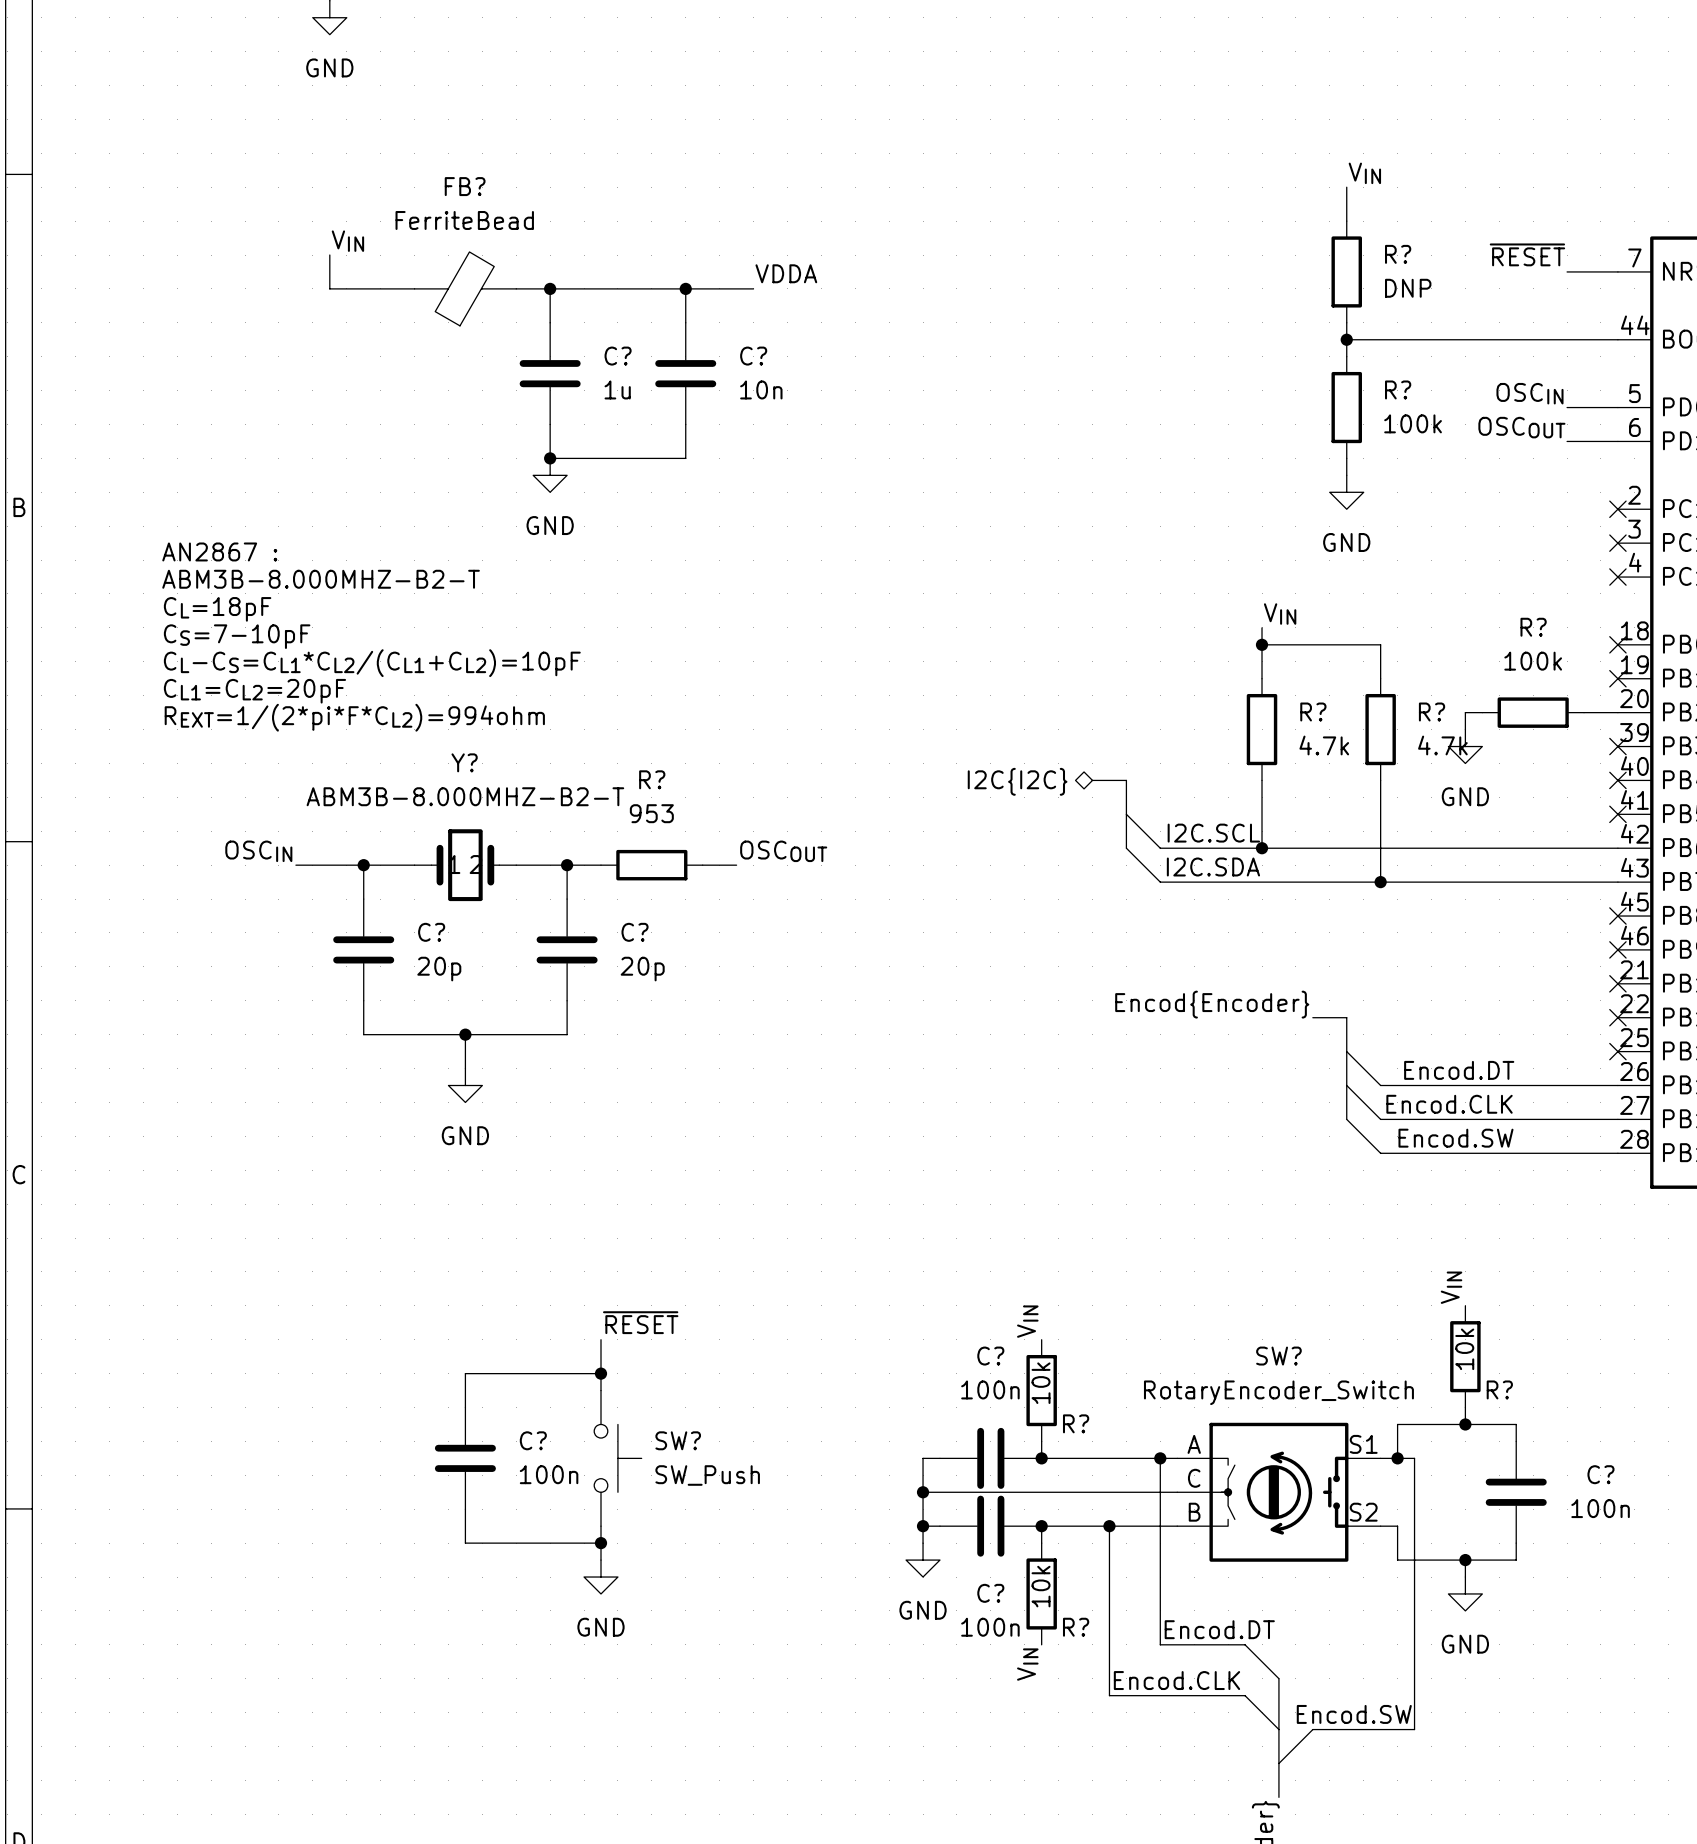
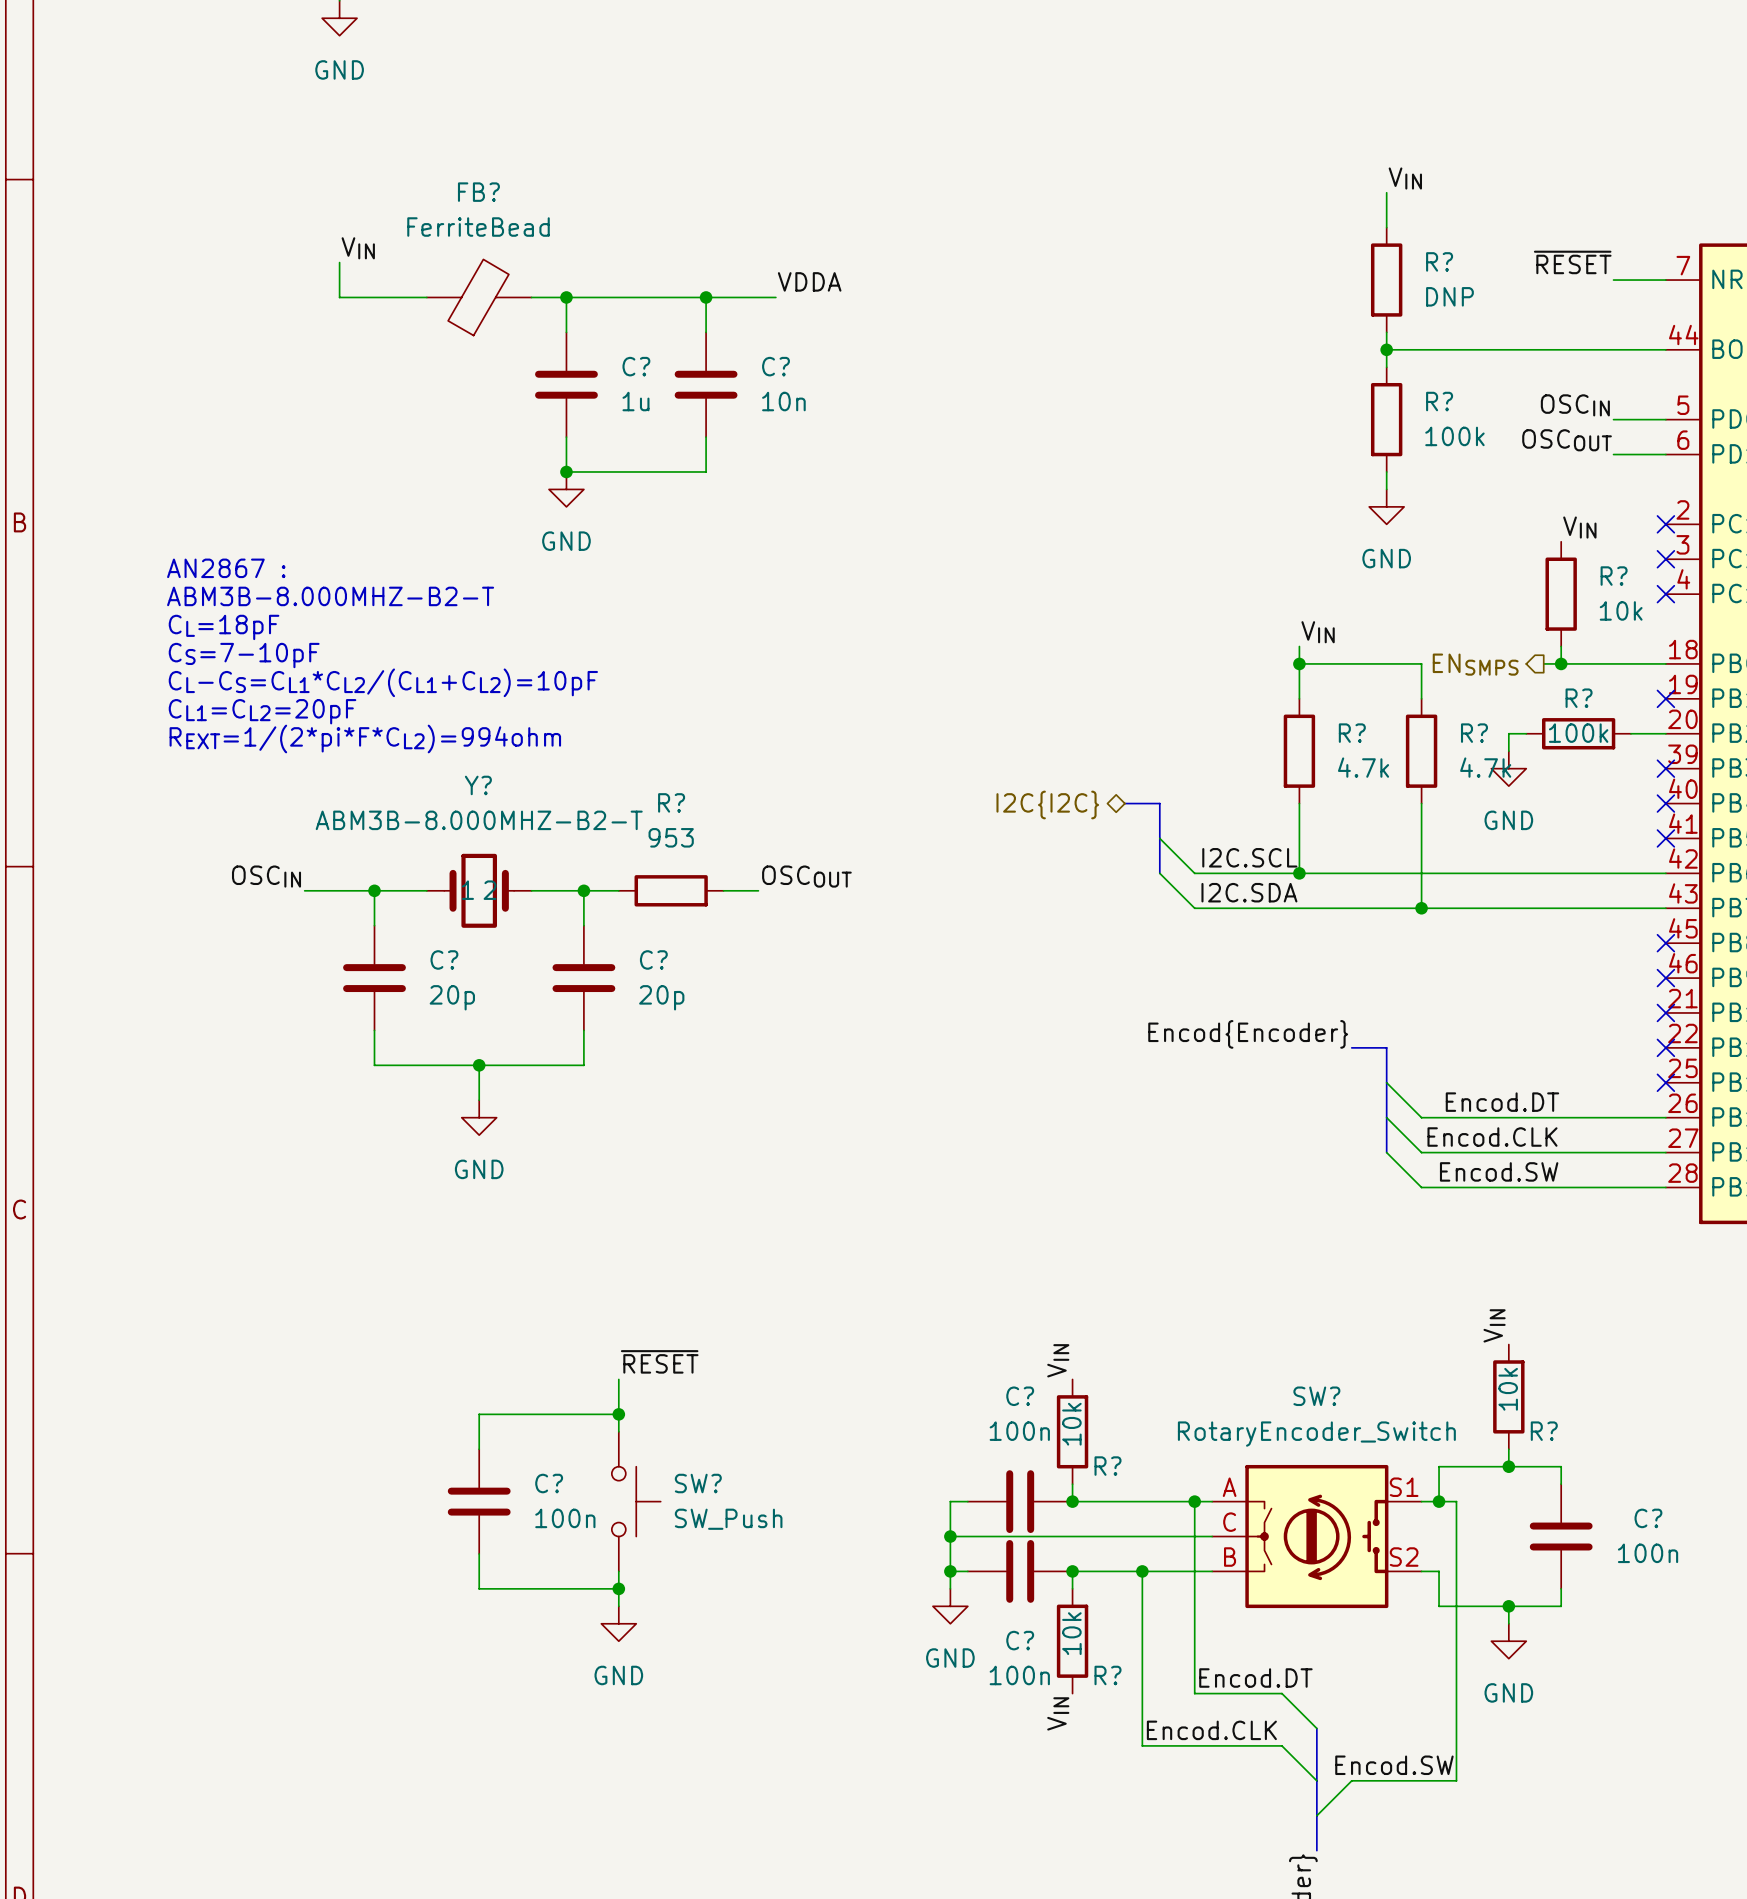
label: none -> VIN (1579, 527)
R?: none -> 10k (1561, 594)
wire: none -> (1561, 646) (1561, 663)
R? name position: R? (1533, 627) -> R? (1579, 698)
wire: none -> (1543, 663) (1665, 663)
junction: none -> (1561, 663)
no-connect mark: (1617, 644) -> none
hierarchical label: none -> ENSMPS (1475, 664)
R? value position: 100k (1533, 661) -> 100k (1578, 733)

